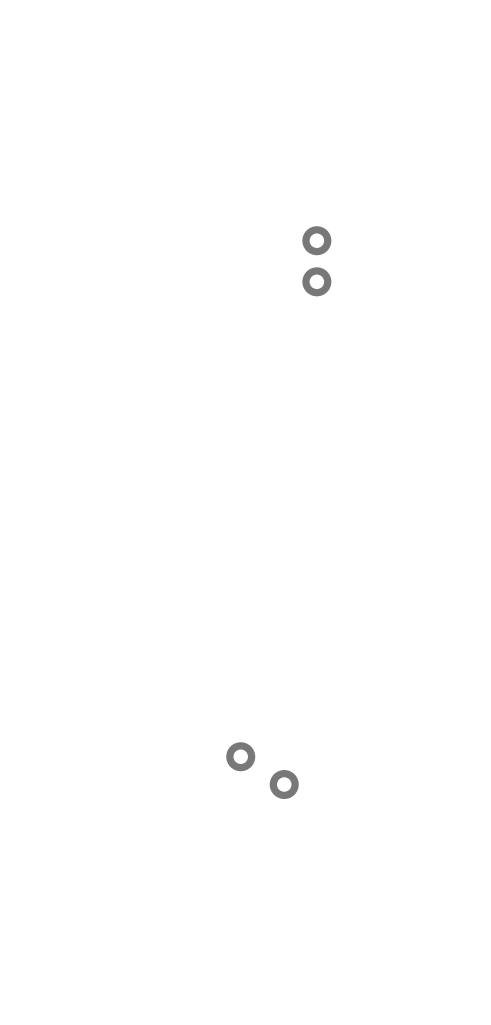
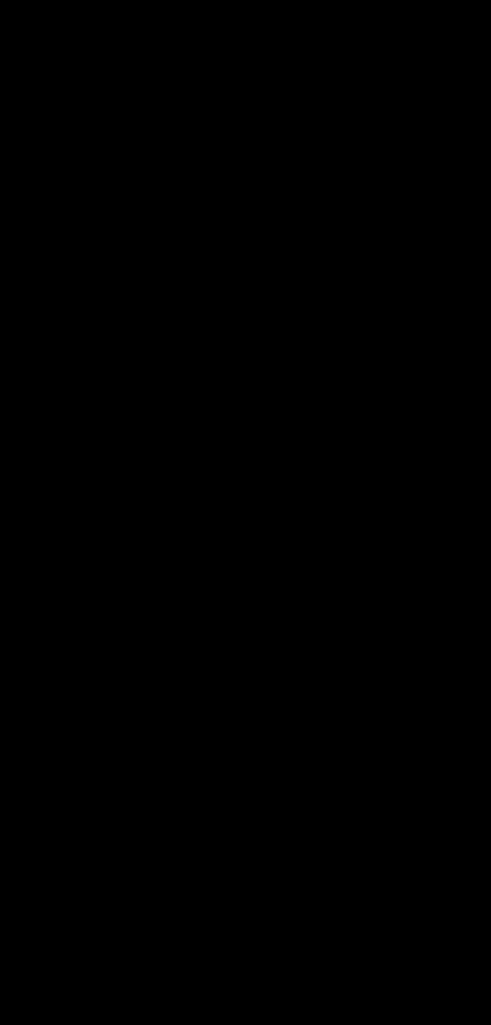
via: (316, 240) -> none
via: (316, 281) -> none
via: (240, 756) -> none
via: (284, 784) -> none

